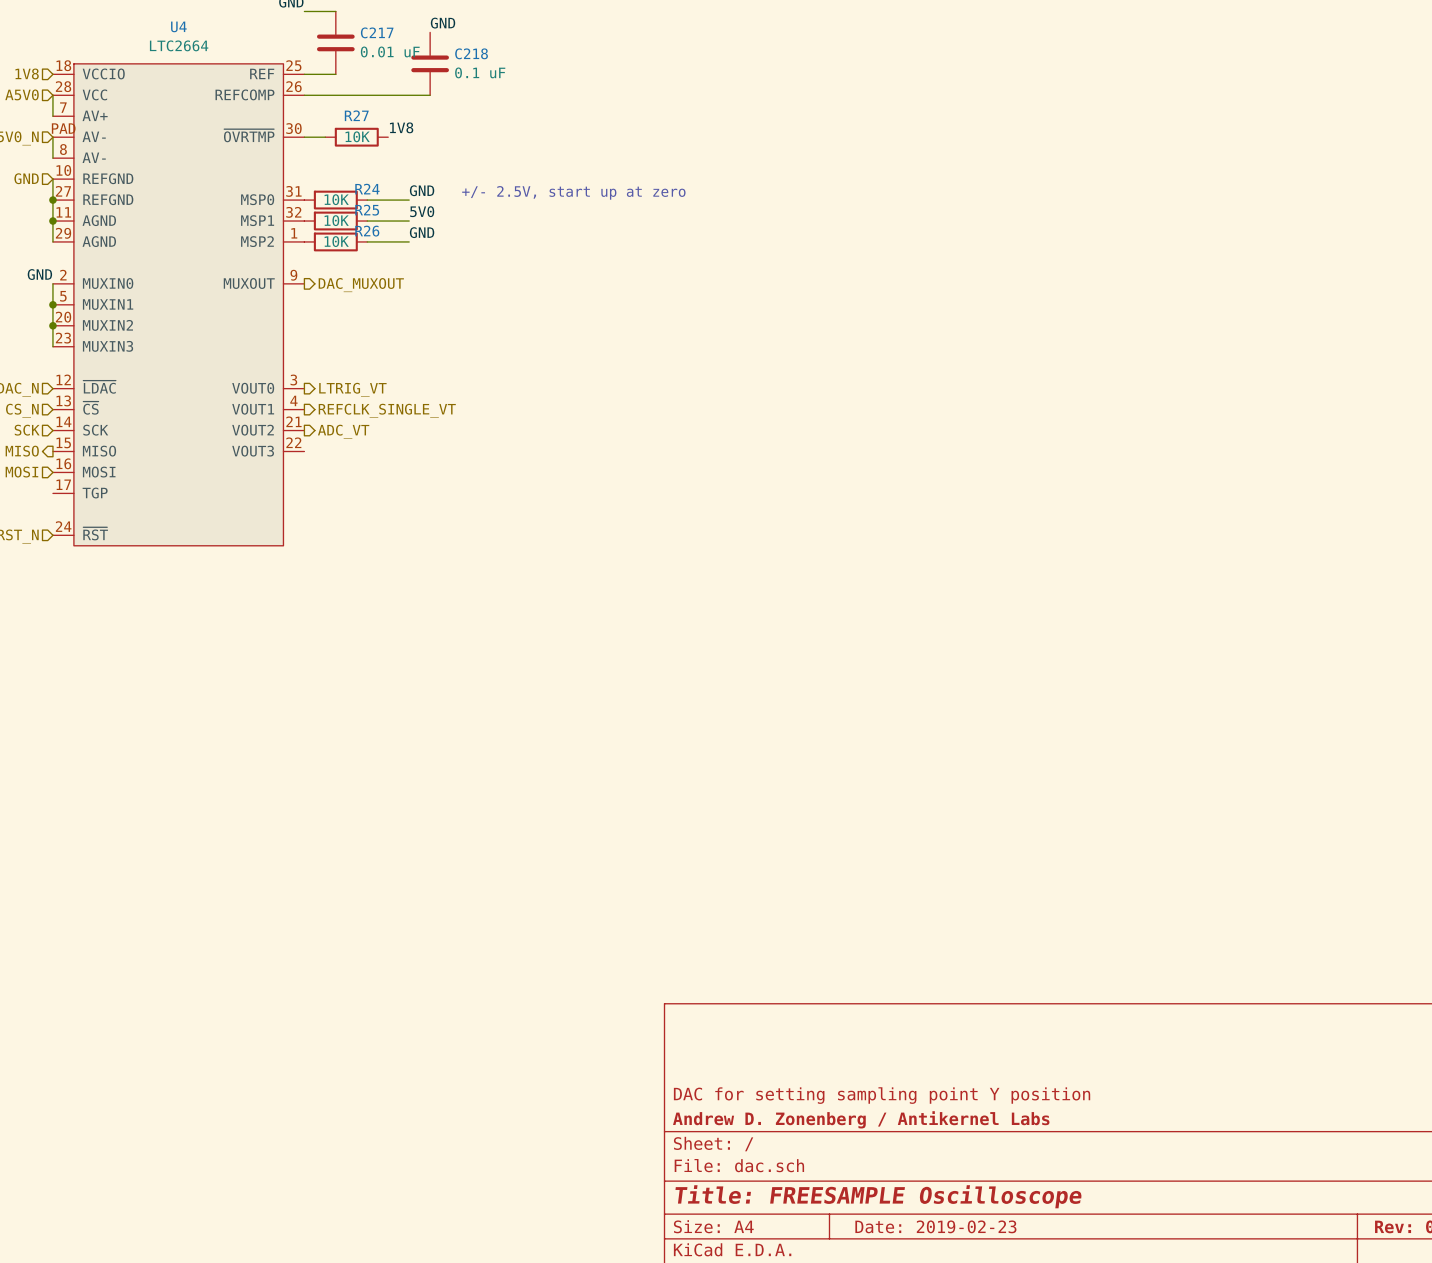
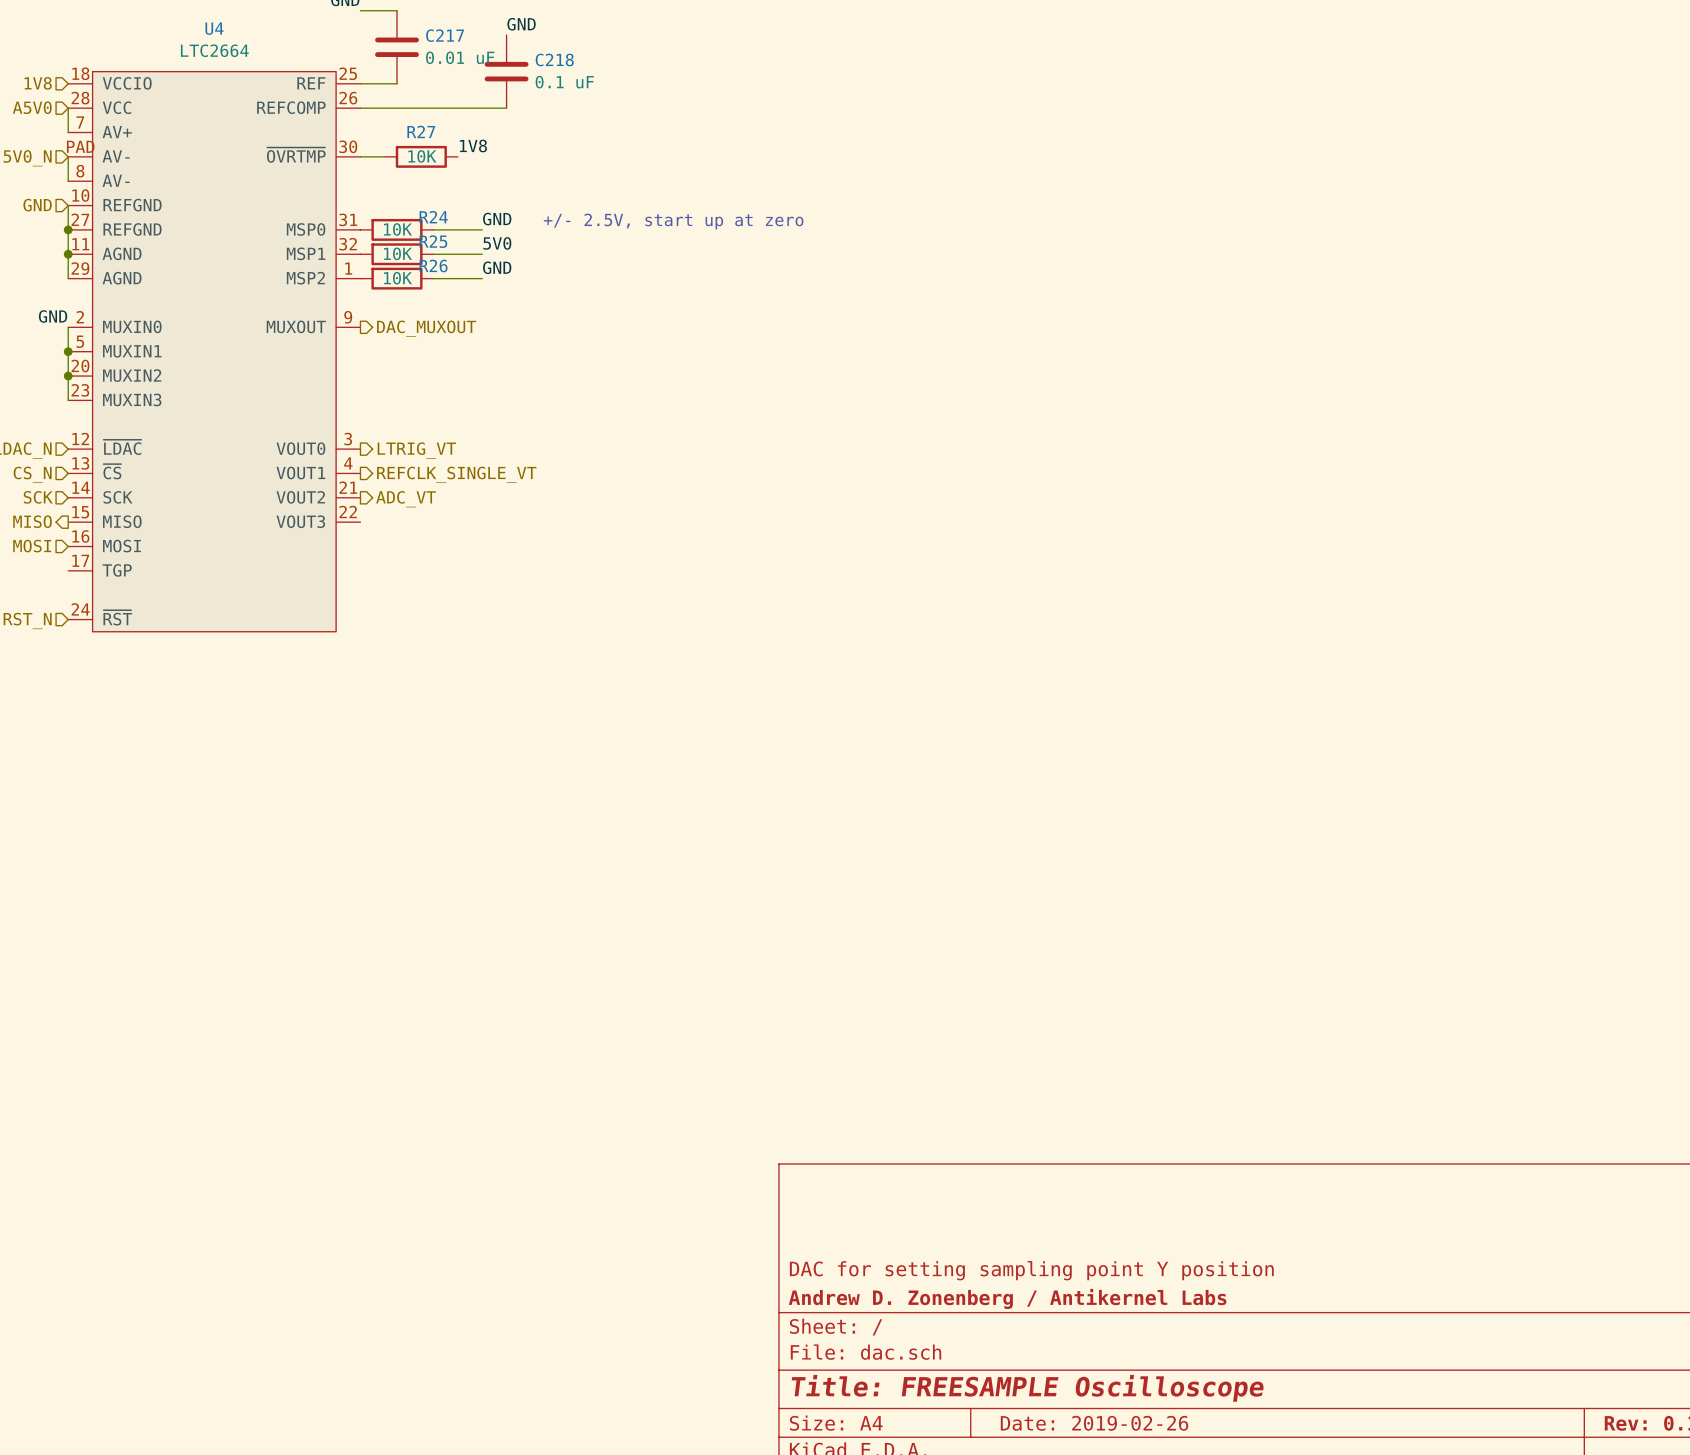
title block: Date: 2019-02-23 (935, 1226) -> Date: 2019-02-26 (1094, 1423)

